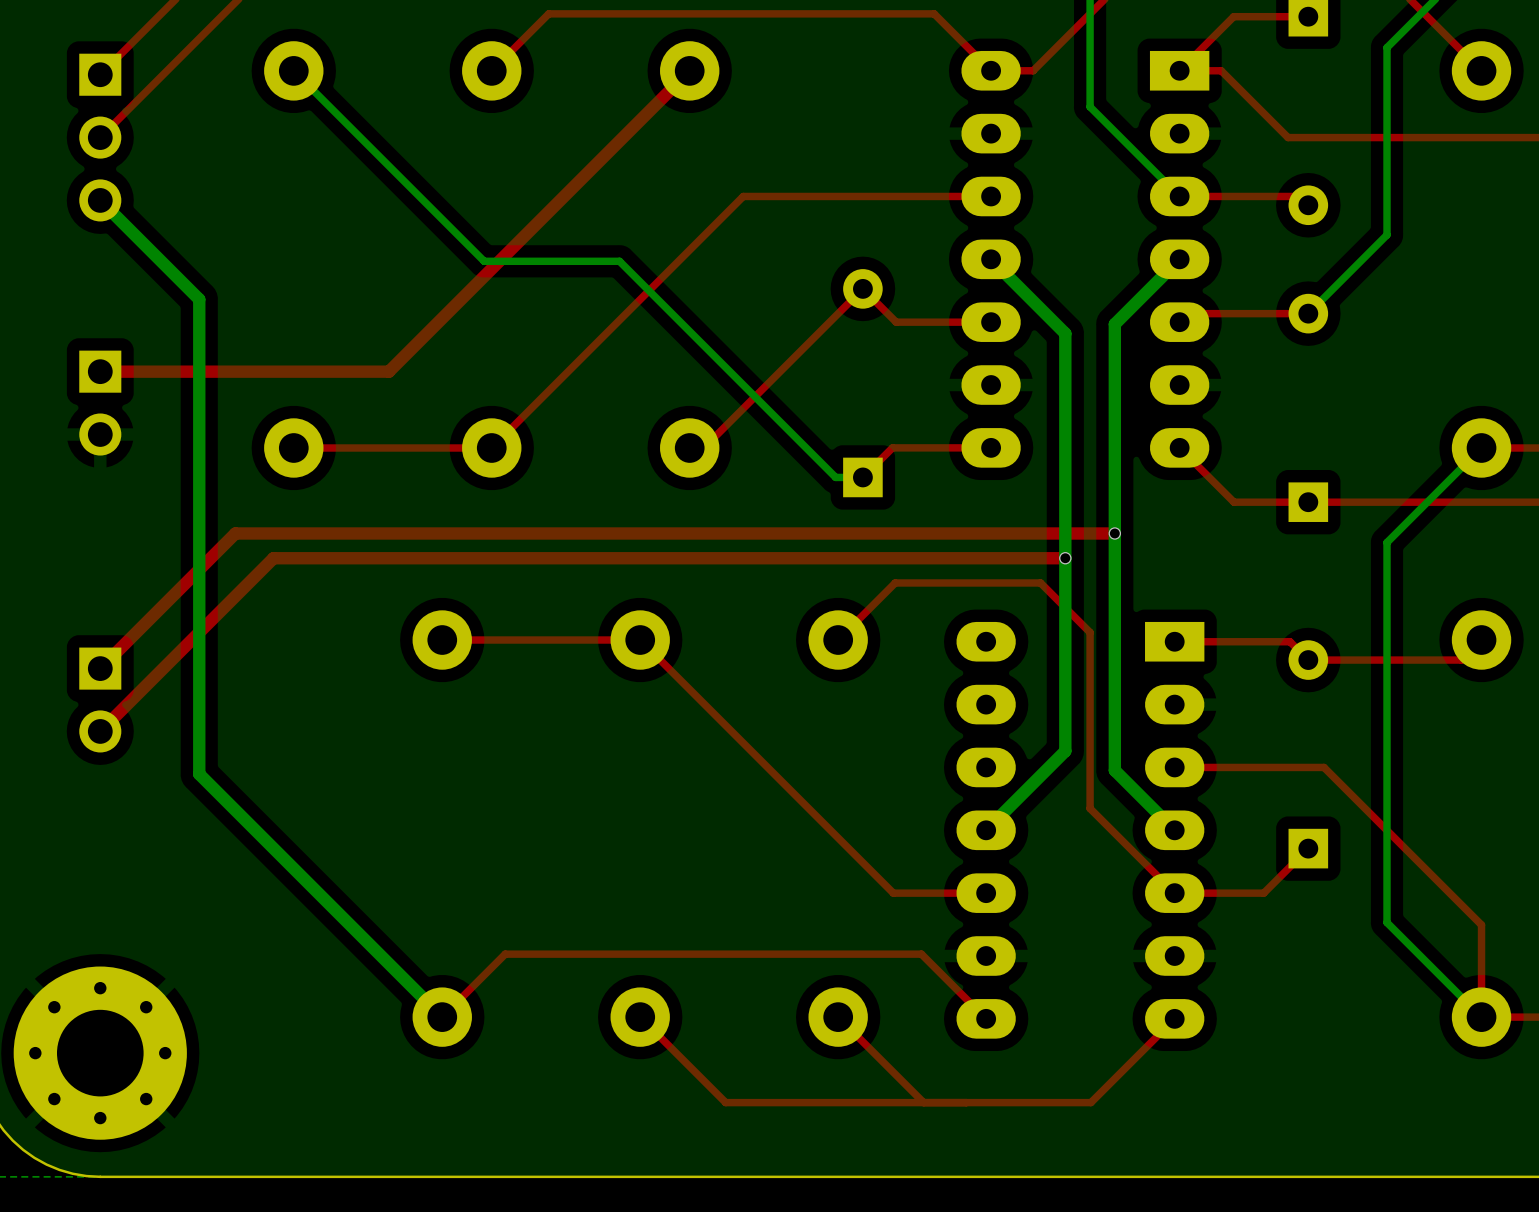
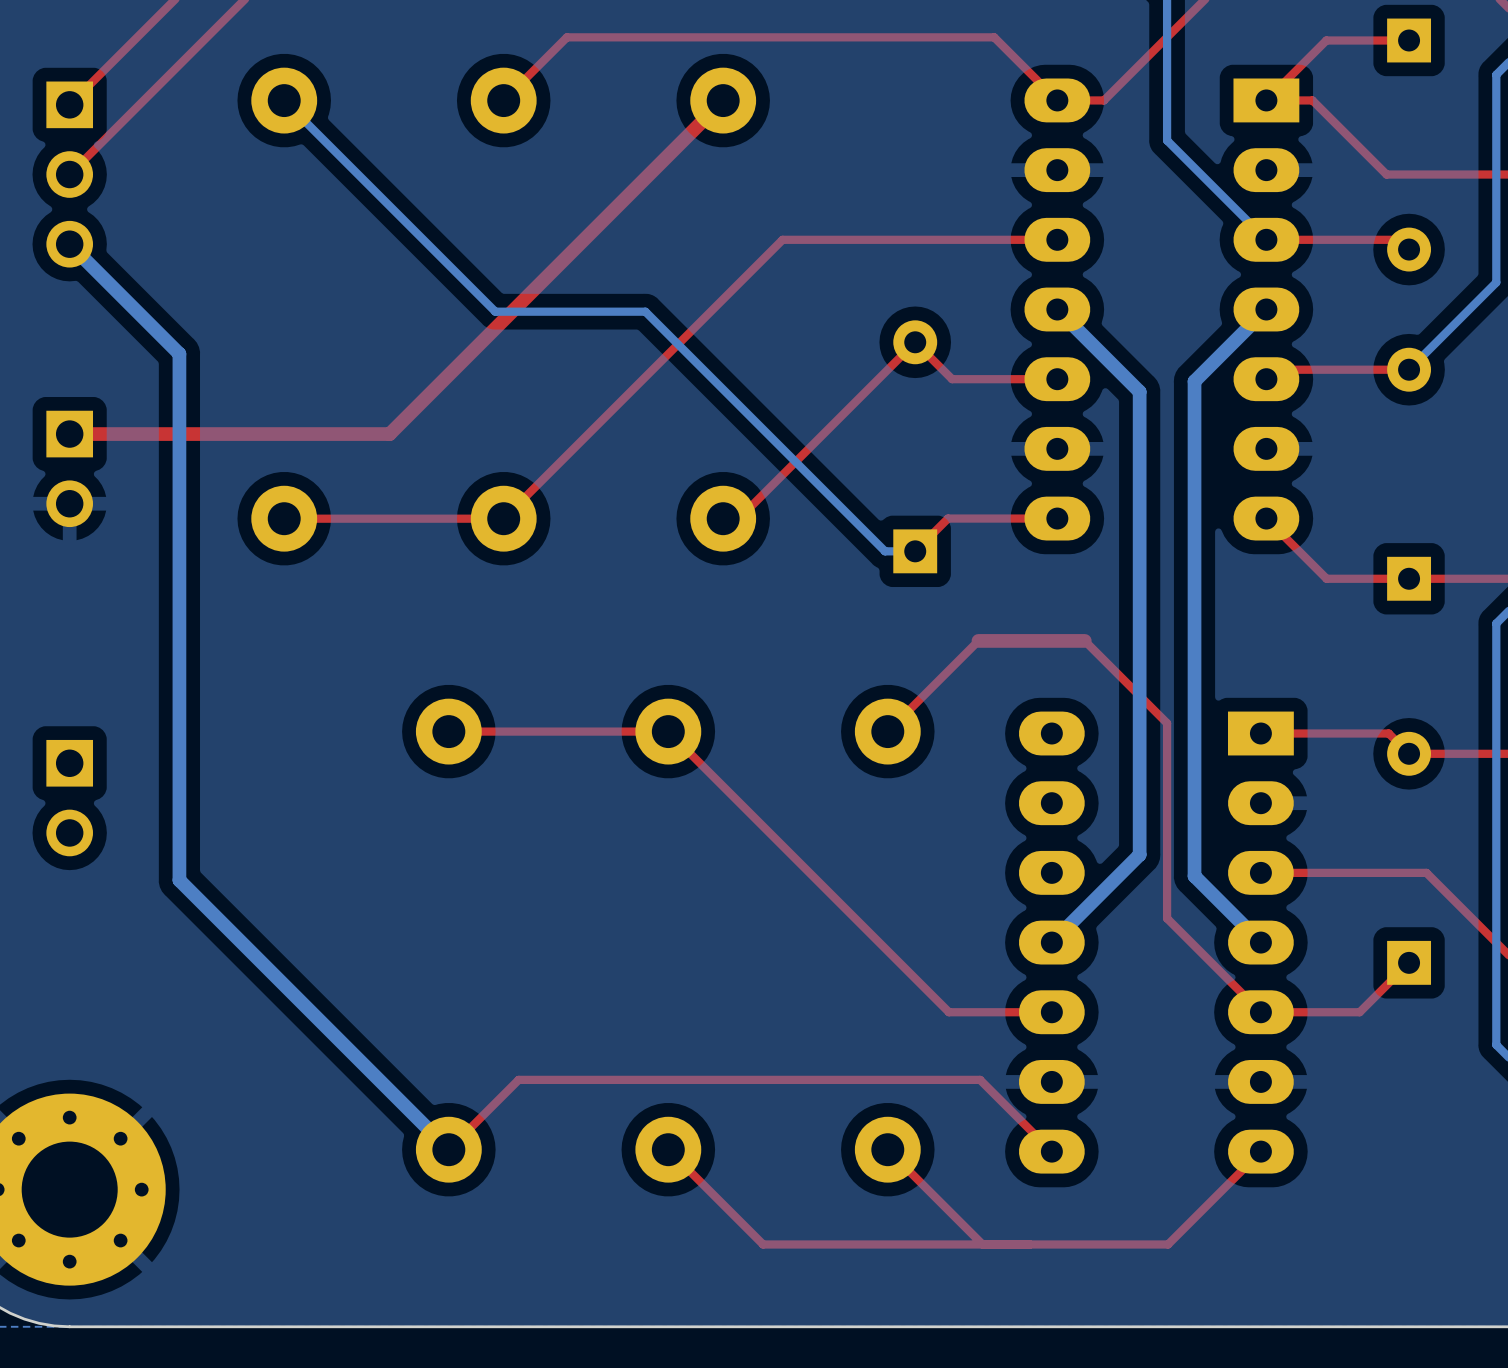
top track: (1114, 533) (235, 533) (100, 668) -> none
via: (1114, 533) -> none
top track: (919, 558) (273, 558) (100, 731) -> none
top track: (1065, 558) (1015, 558) -> (1112, 668) (1084, 640)
via: (1065, 558) -> none
top track: (1040, 582) (895, 582) -> (978, 640) (951, 668)

